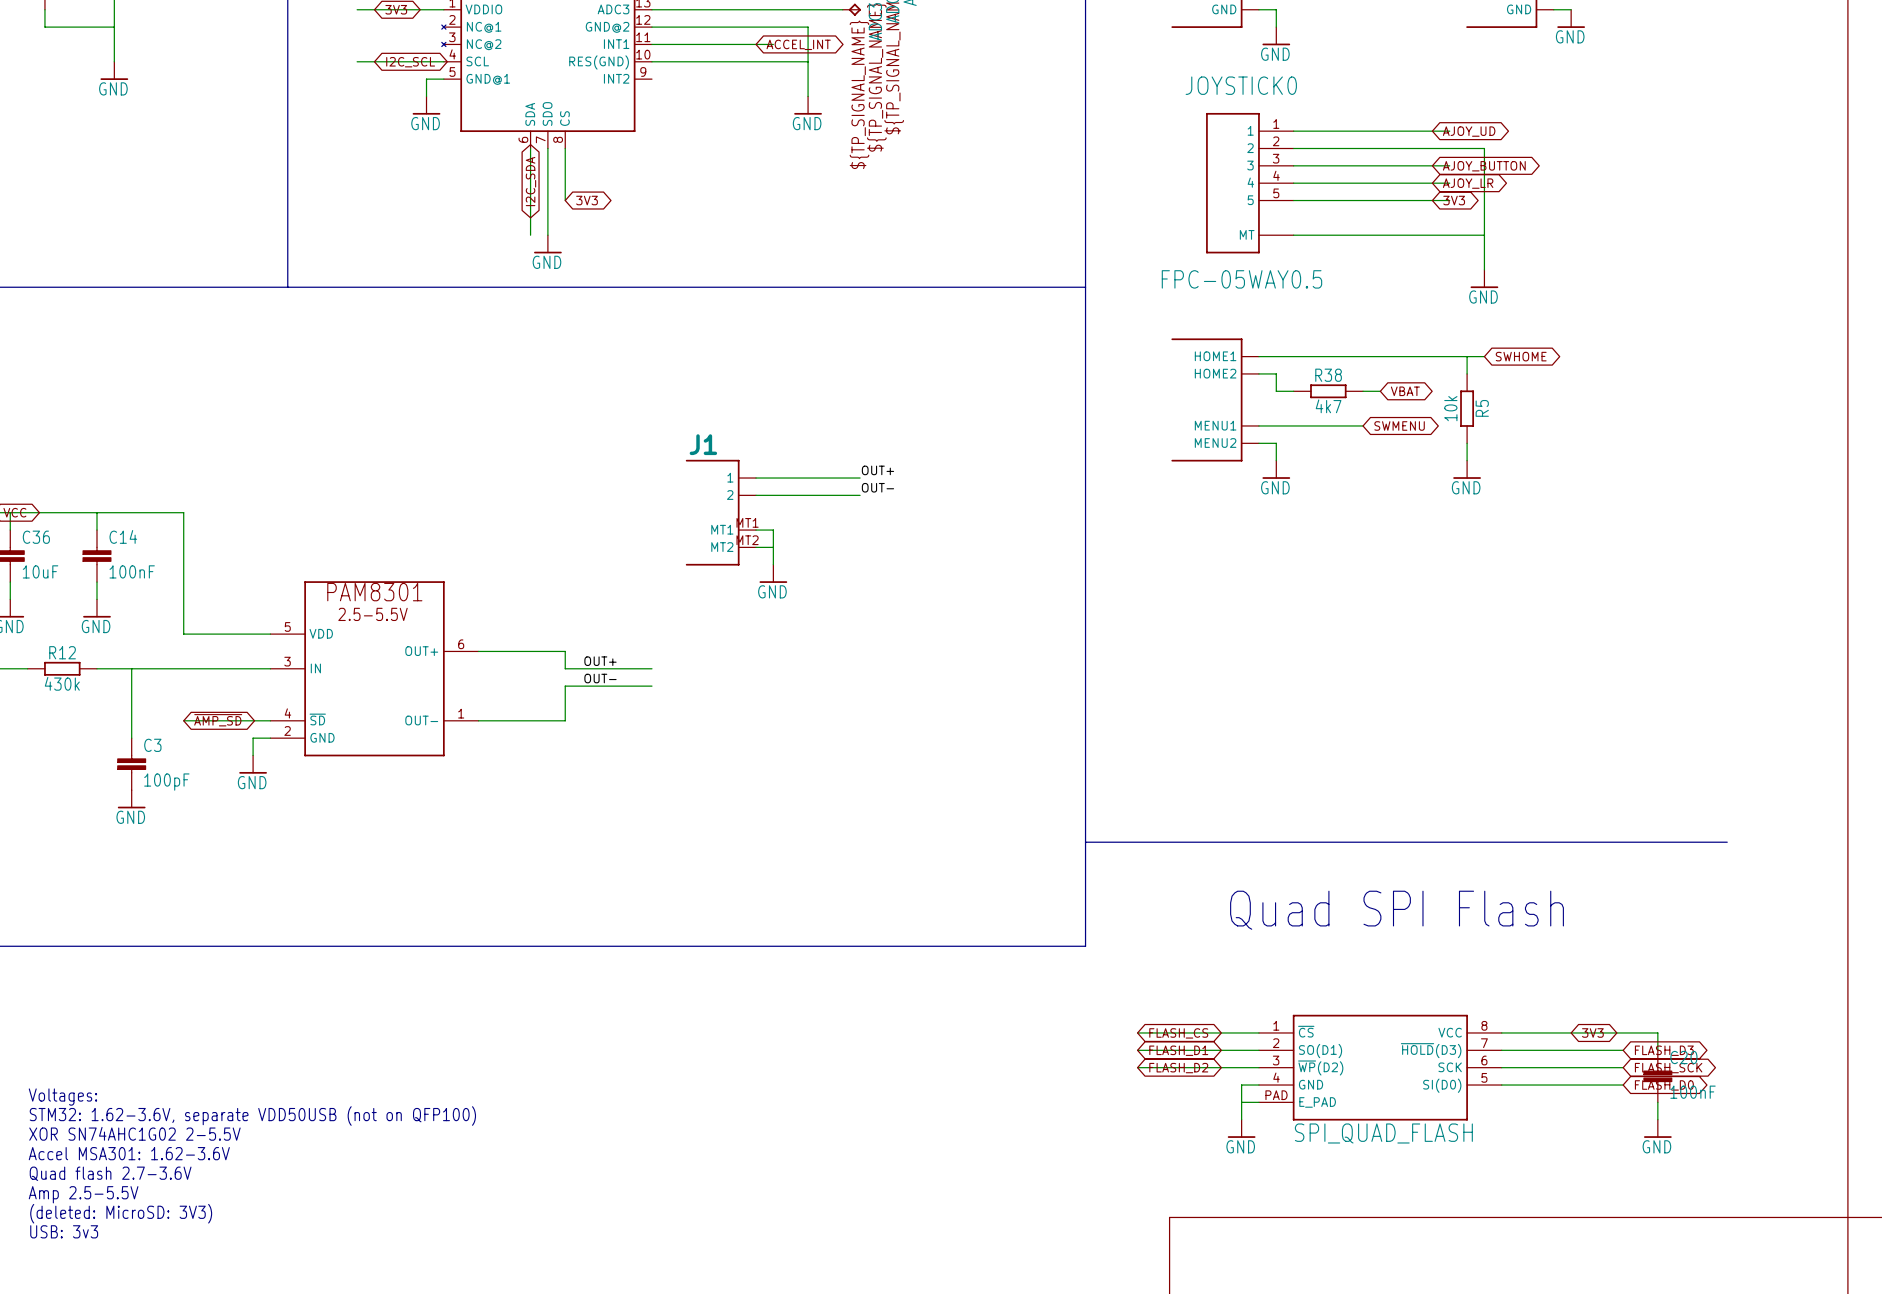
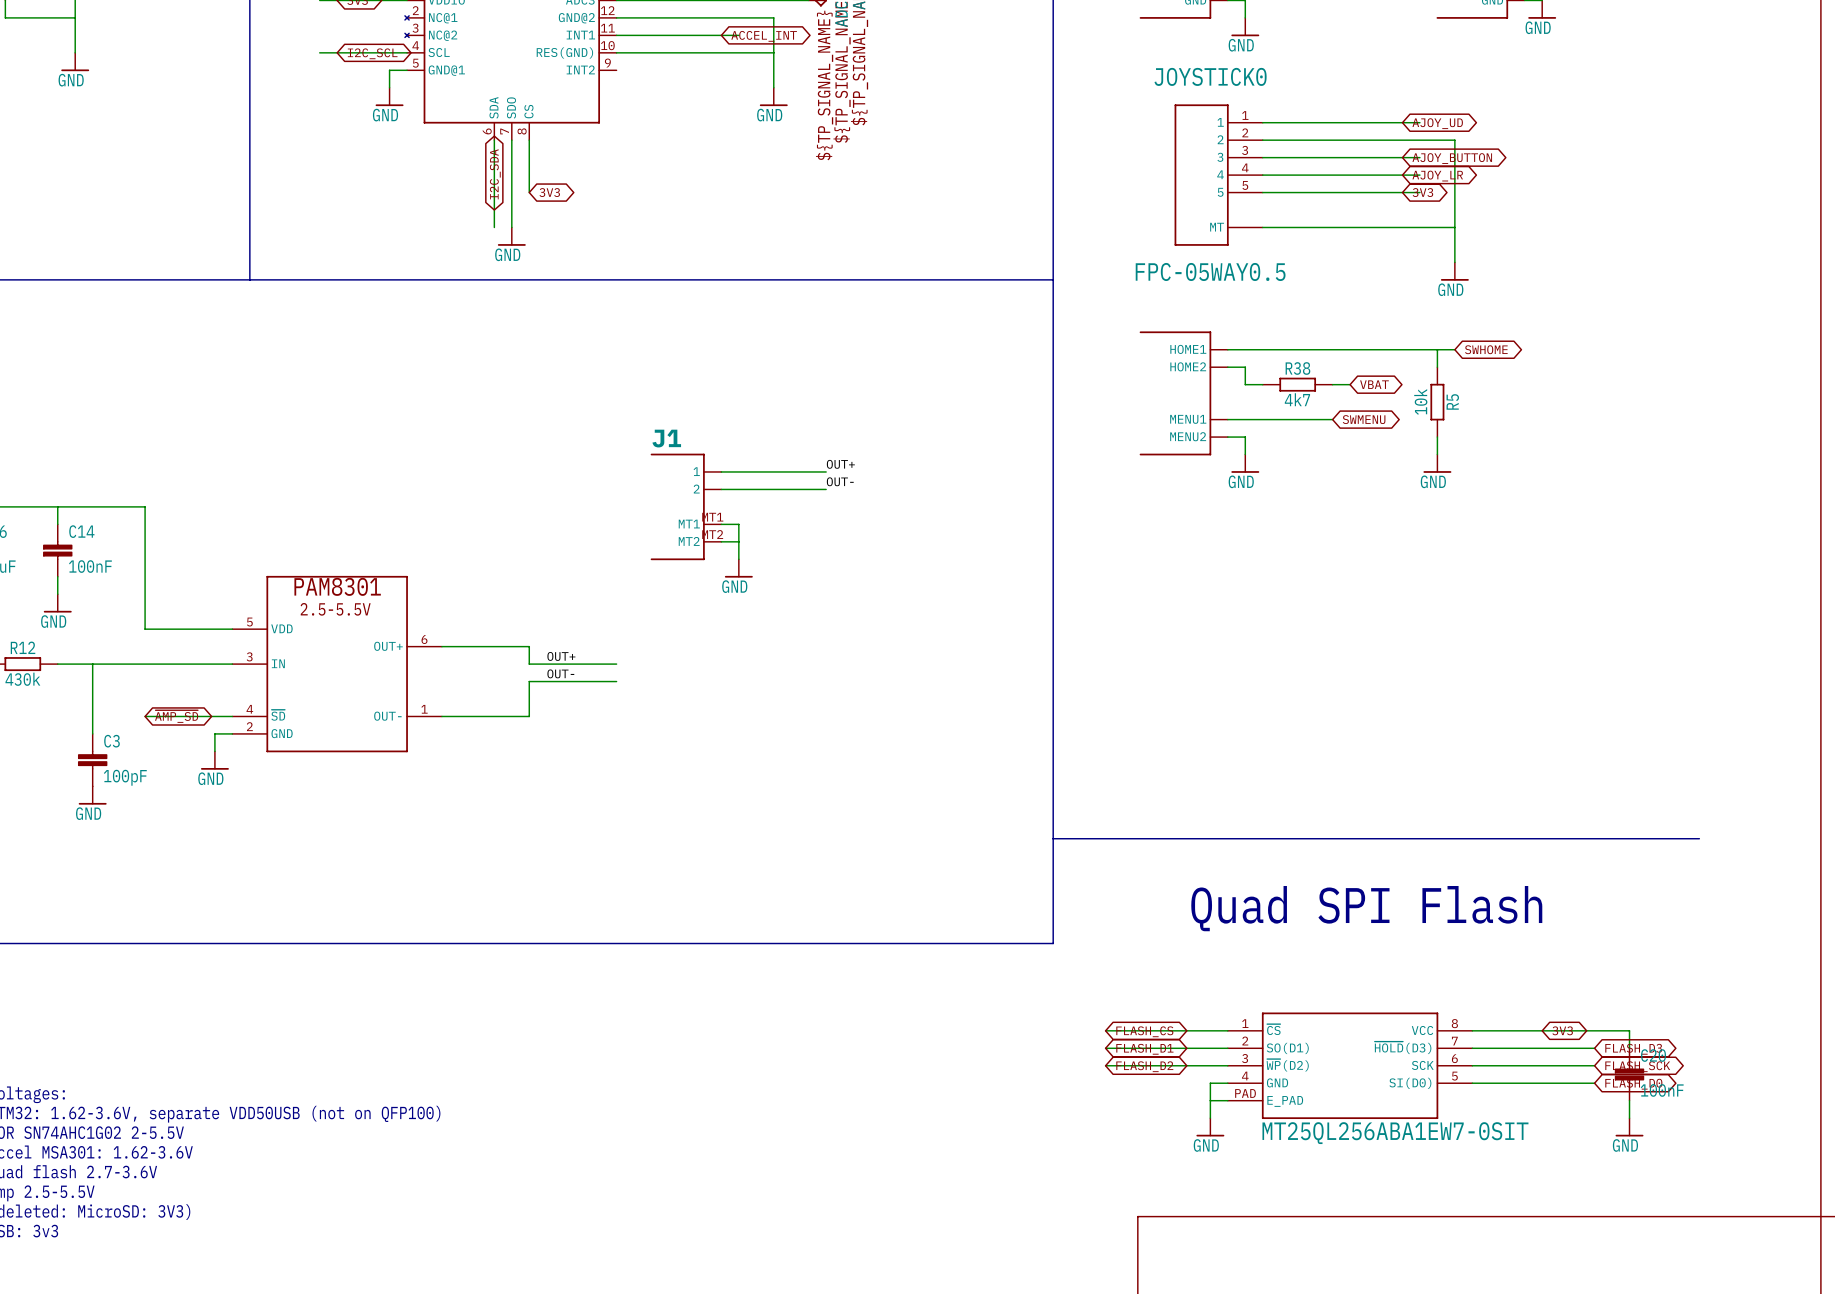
part value: SPI_QUAD_FLASH (1383, 1133) -> MT25QL256ABA1EW7-0SIT (1395, 1133)

